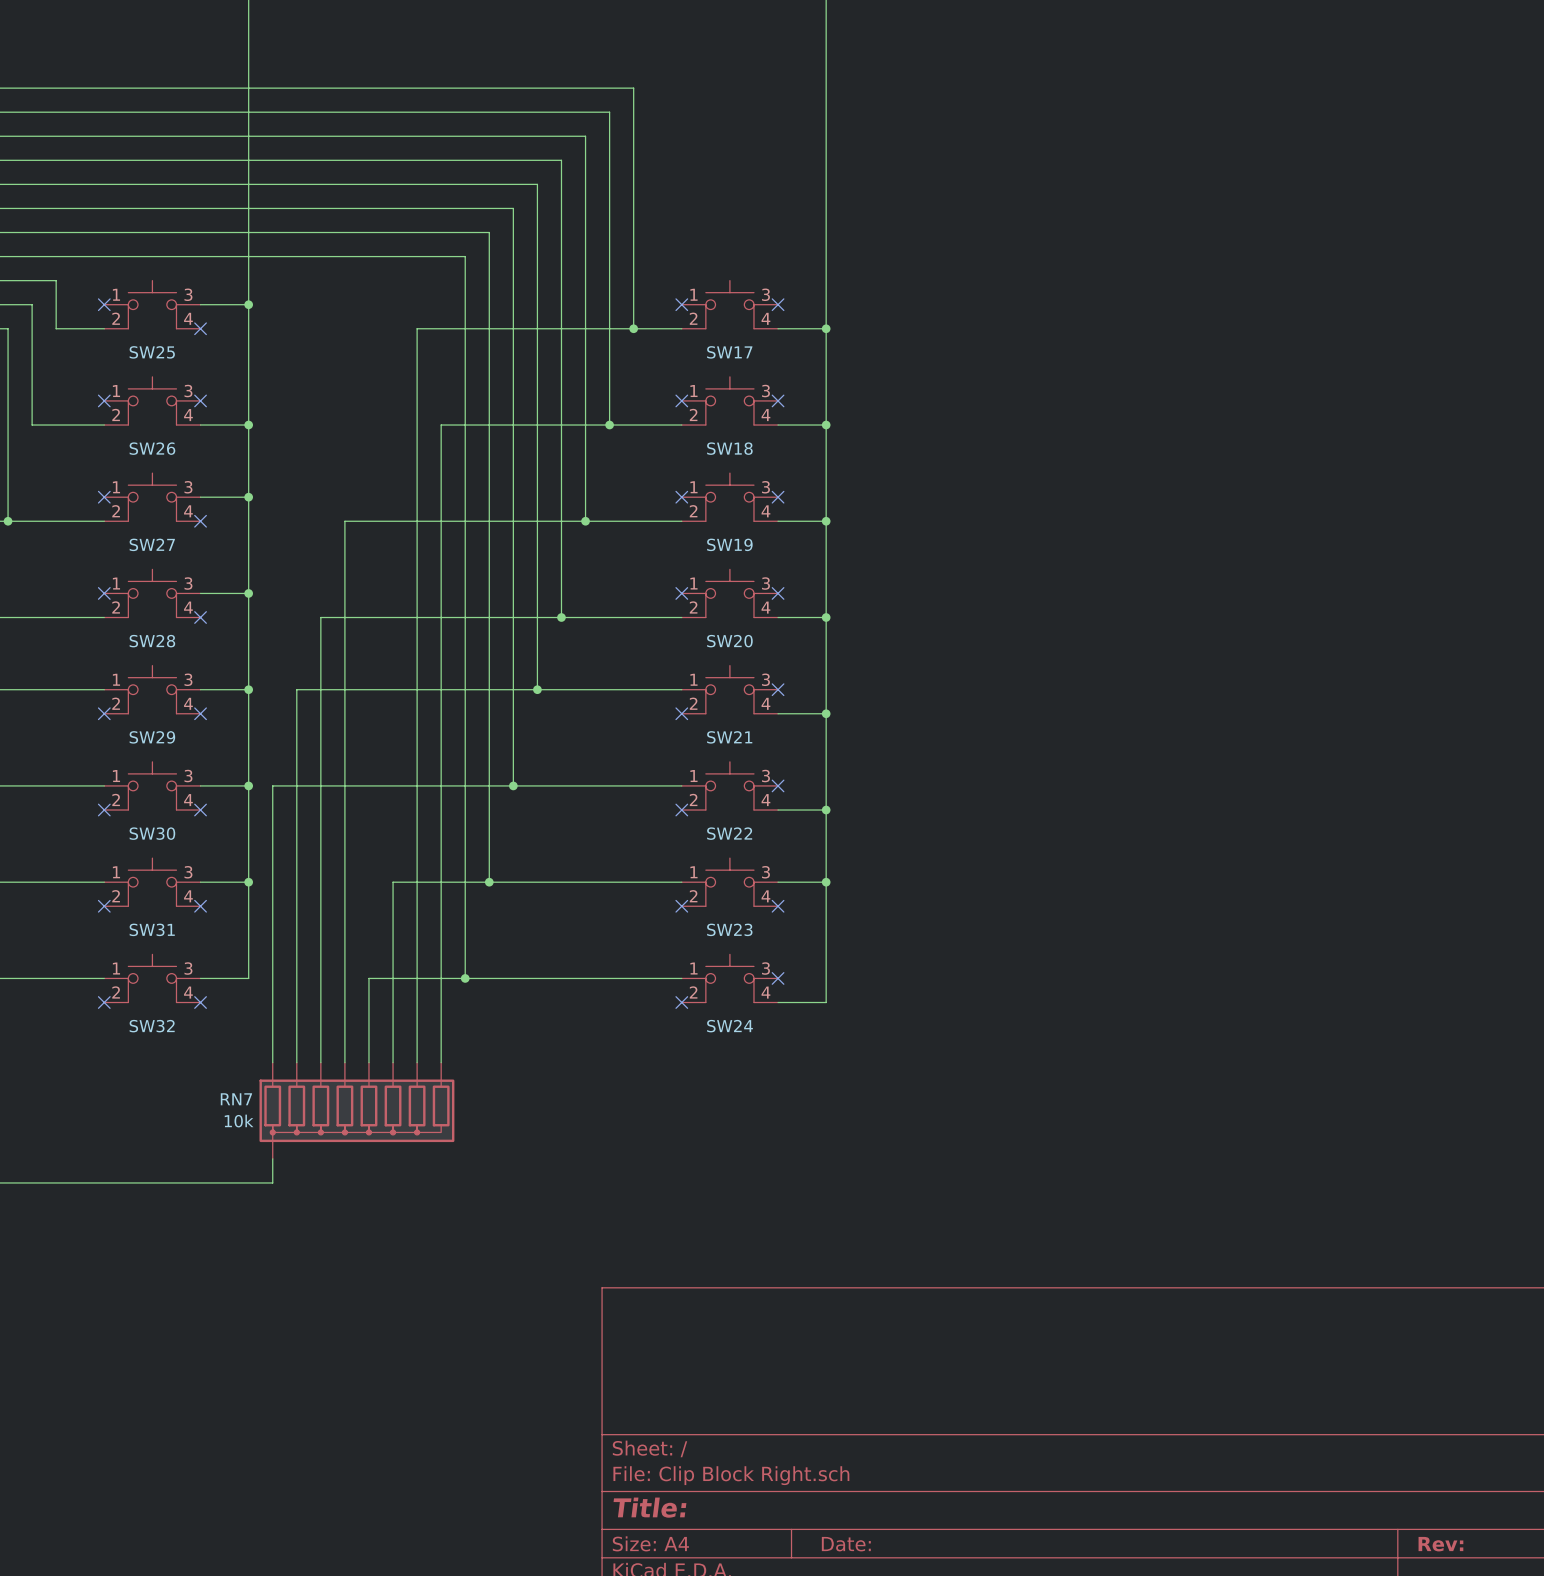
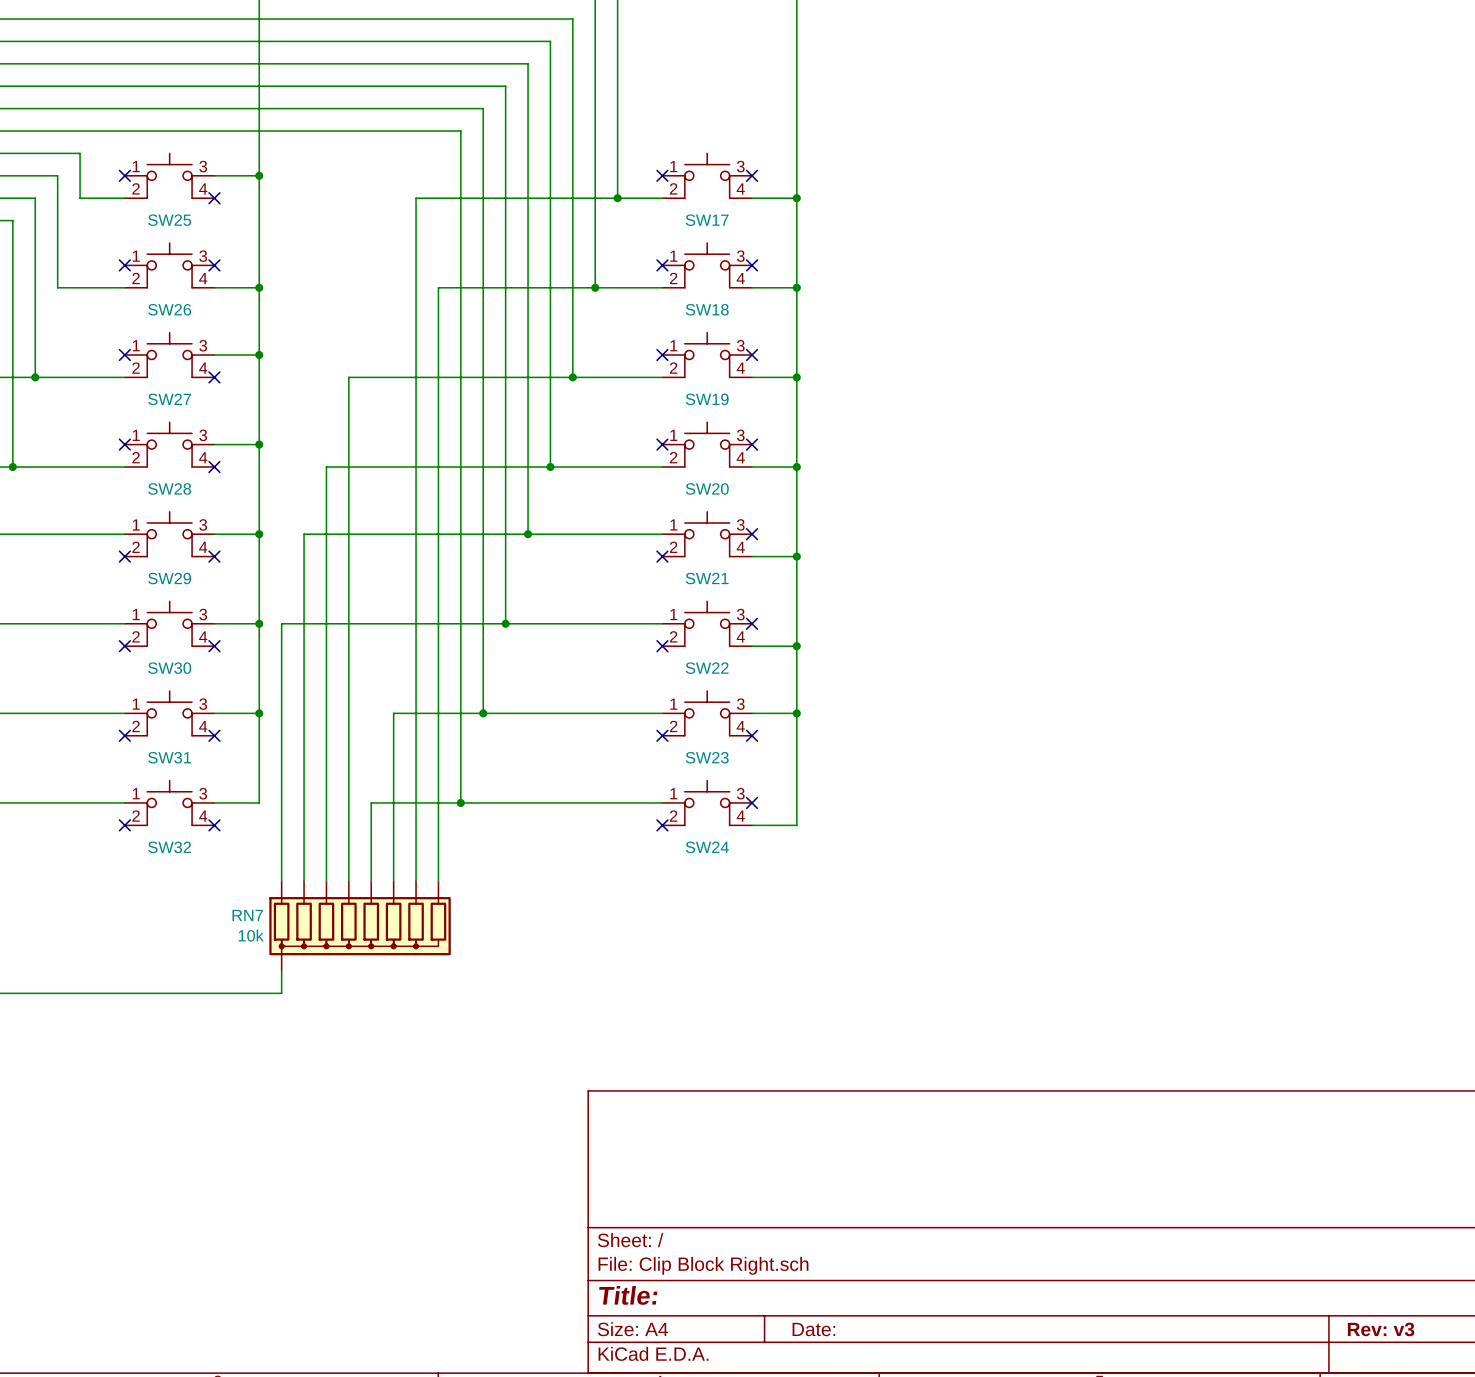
title block: Rev: (1440, 1544) -> Rev: v3 (1381, 1329)

